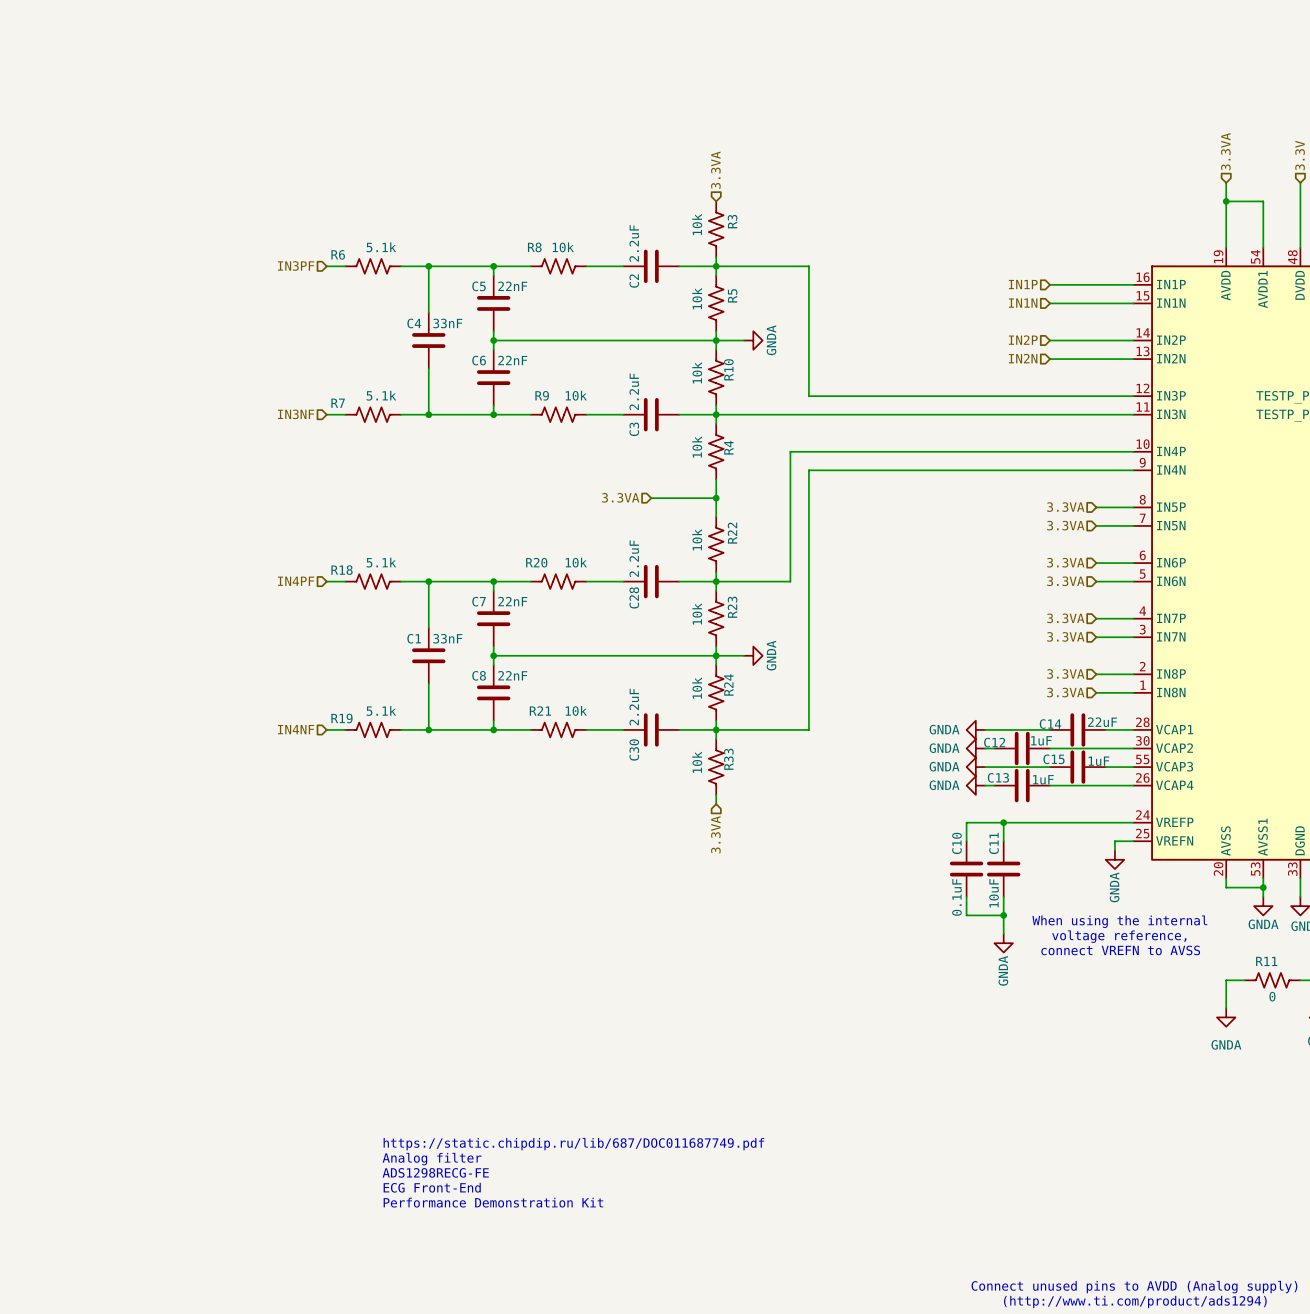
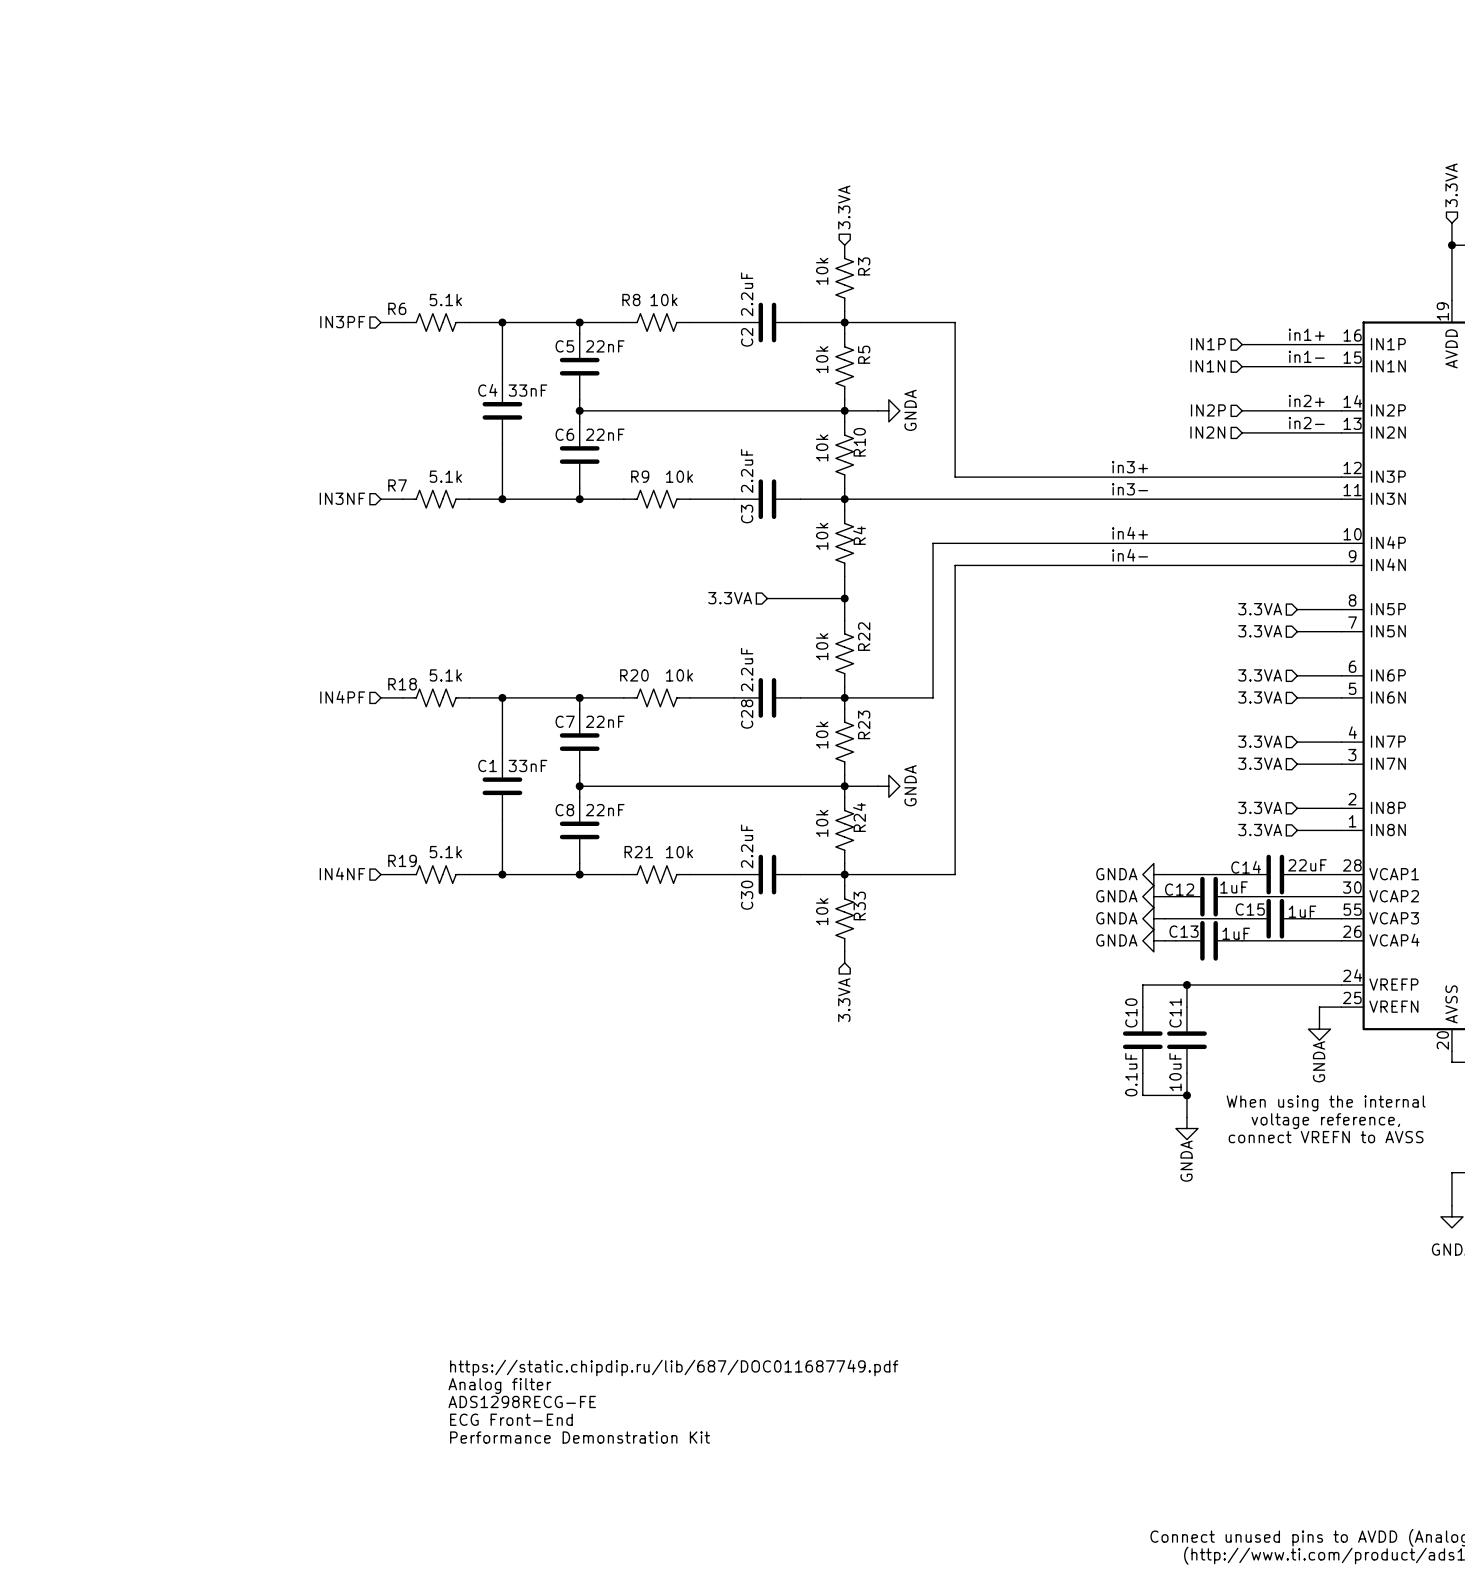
label: none -> in1+ (1306, 334)
label: none -> in1- (1306, 356)
label: none -> in2+ (1306, 401)
label: none -> in2- (1306, 423)
label: none -> in3+ (1130, 467)
label: none -> in3- (1130, 489)
label: none -> in4+ (1130, 533)
label: none -> in4- (1130, 555)

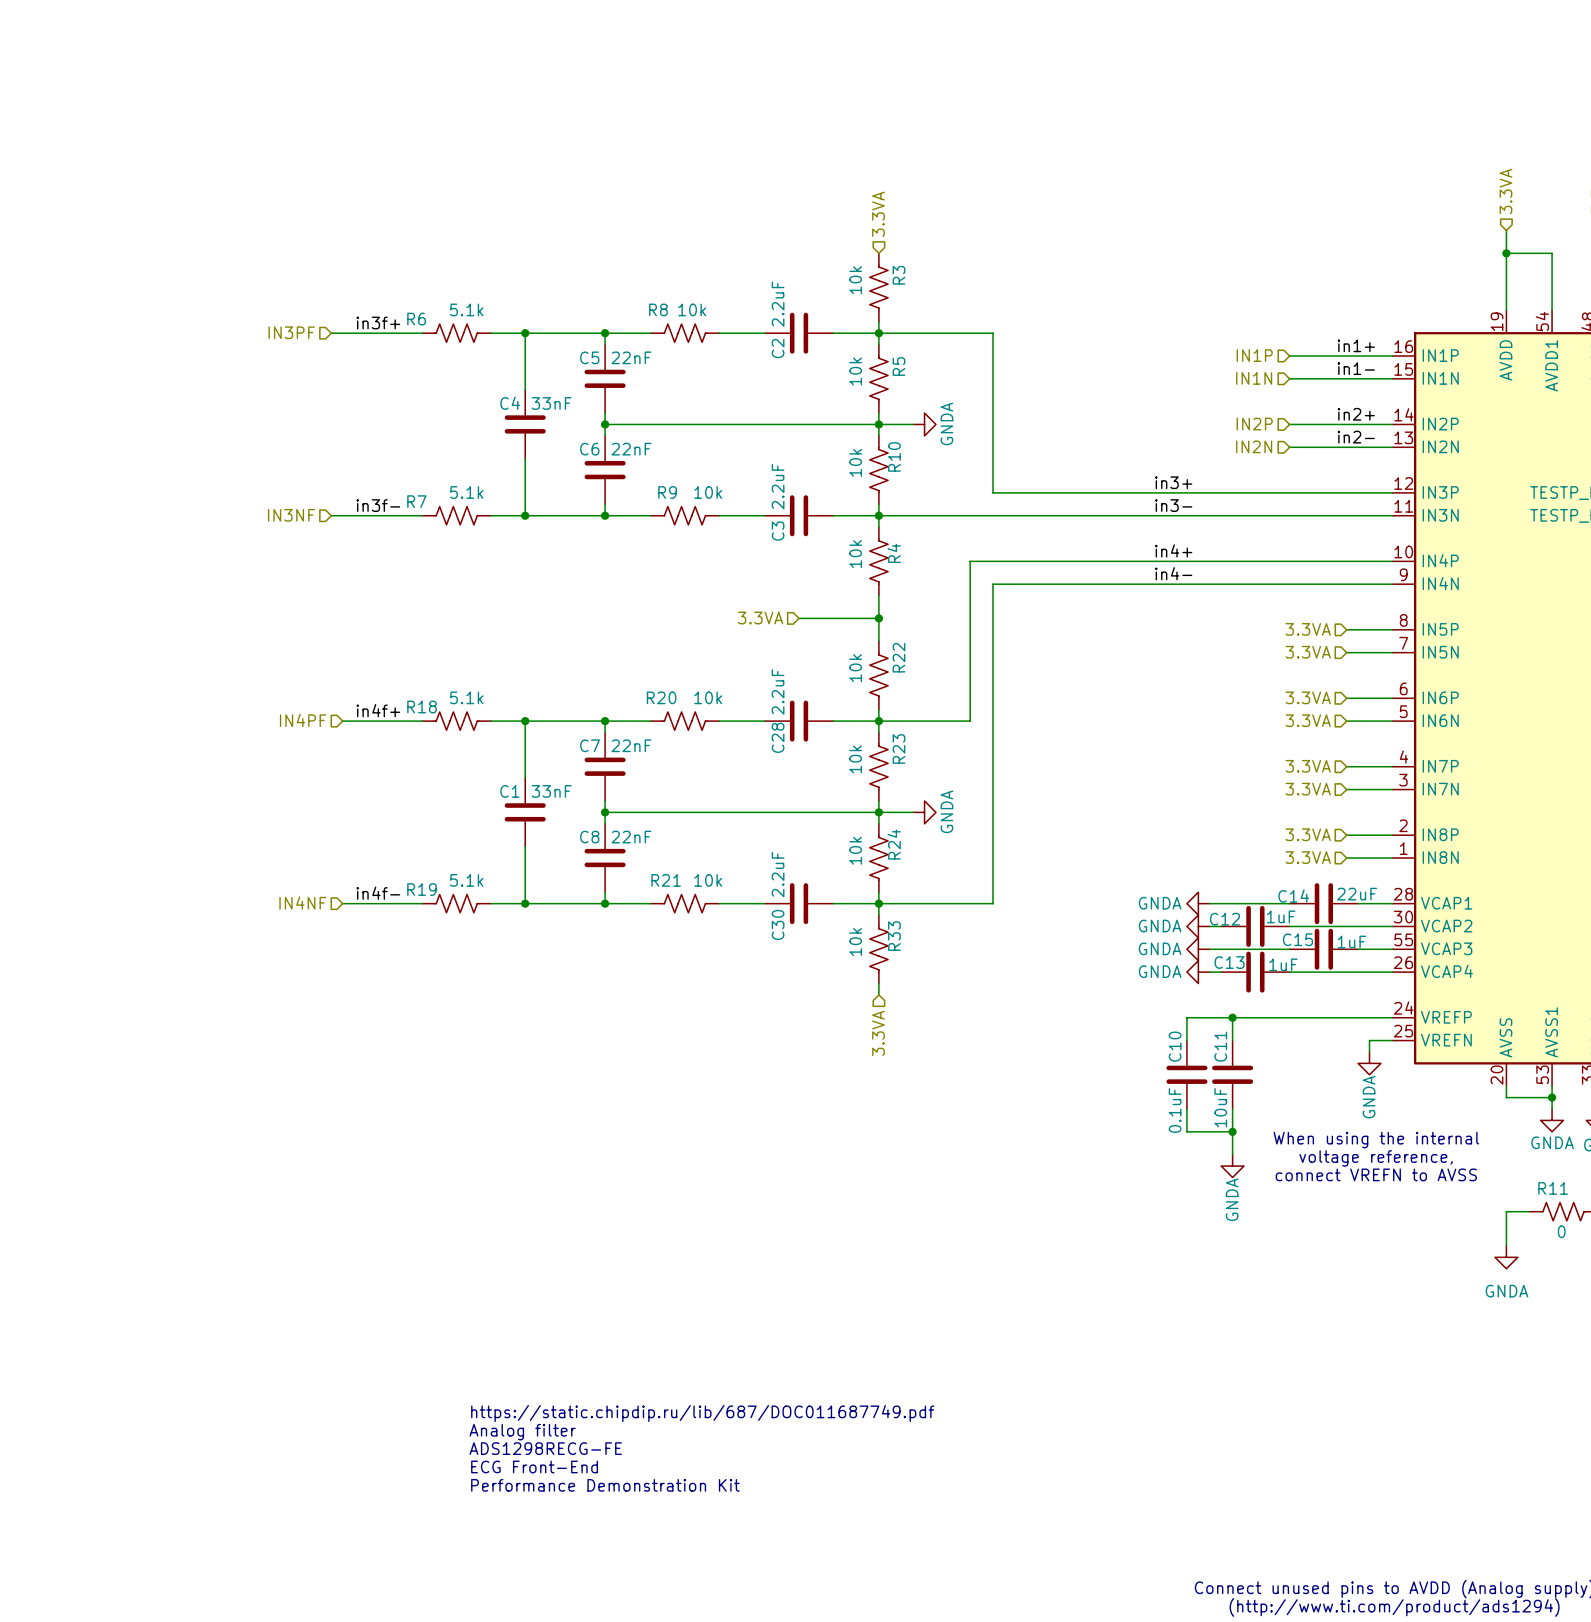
label: none -> in3f+ (378, 323)
wire: none -> (331, 333) (399, 333)
hierarchical label position: IN3PF (342, 322) -> IN3PF (291, 332)
label: none -> in3f- (378, 505)
hierarchical label position: IN3NF (342, 498) -> IN3NF (291, 515)
wire: none -> (331, 515) (399, 515)
label: none -> in4f+ (378, 710)
wire: none -> (342, 721) (399, 721)
hierarchical label position: IN4PF (342, 697) -> IN4PF (303, 720)
label: none -> in4f- (378, 893)
hierarchical label position: IN4NF (342, 873) -> IN4NF (302, 902)
wire: none -> (342, 903) (399, 903)

